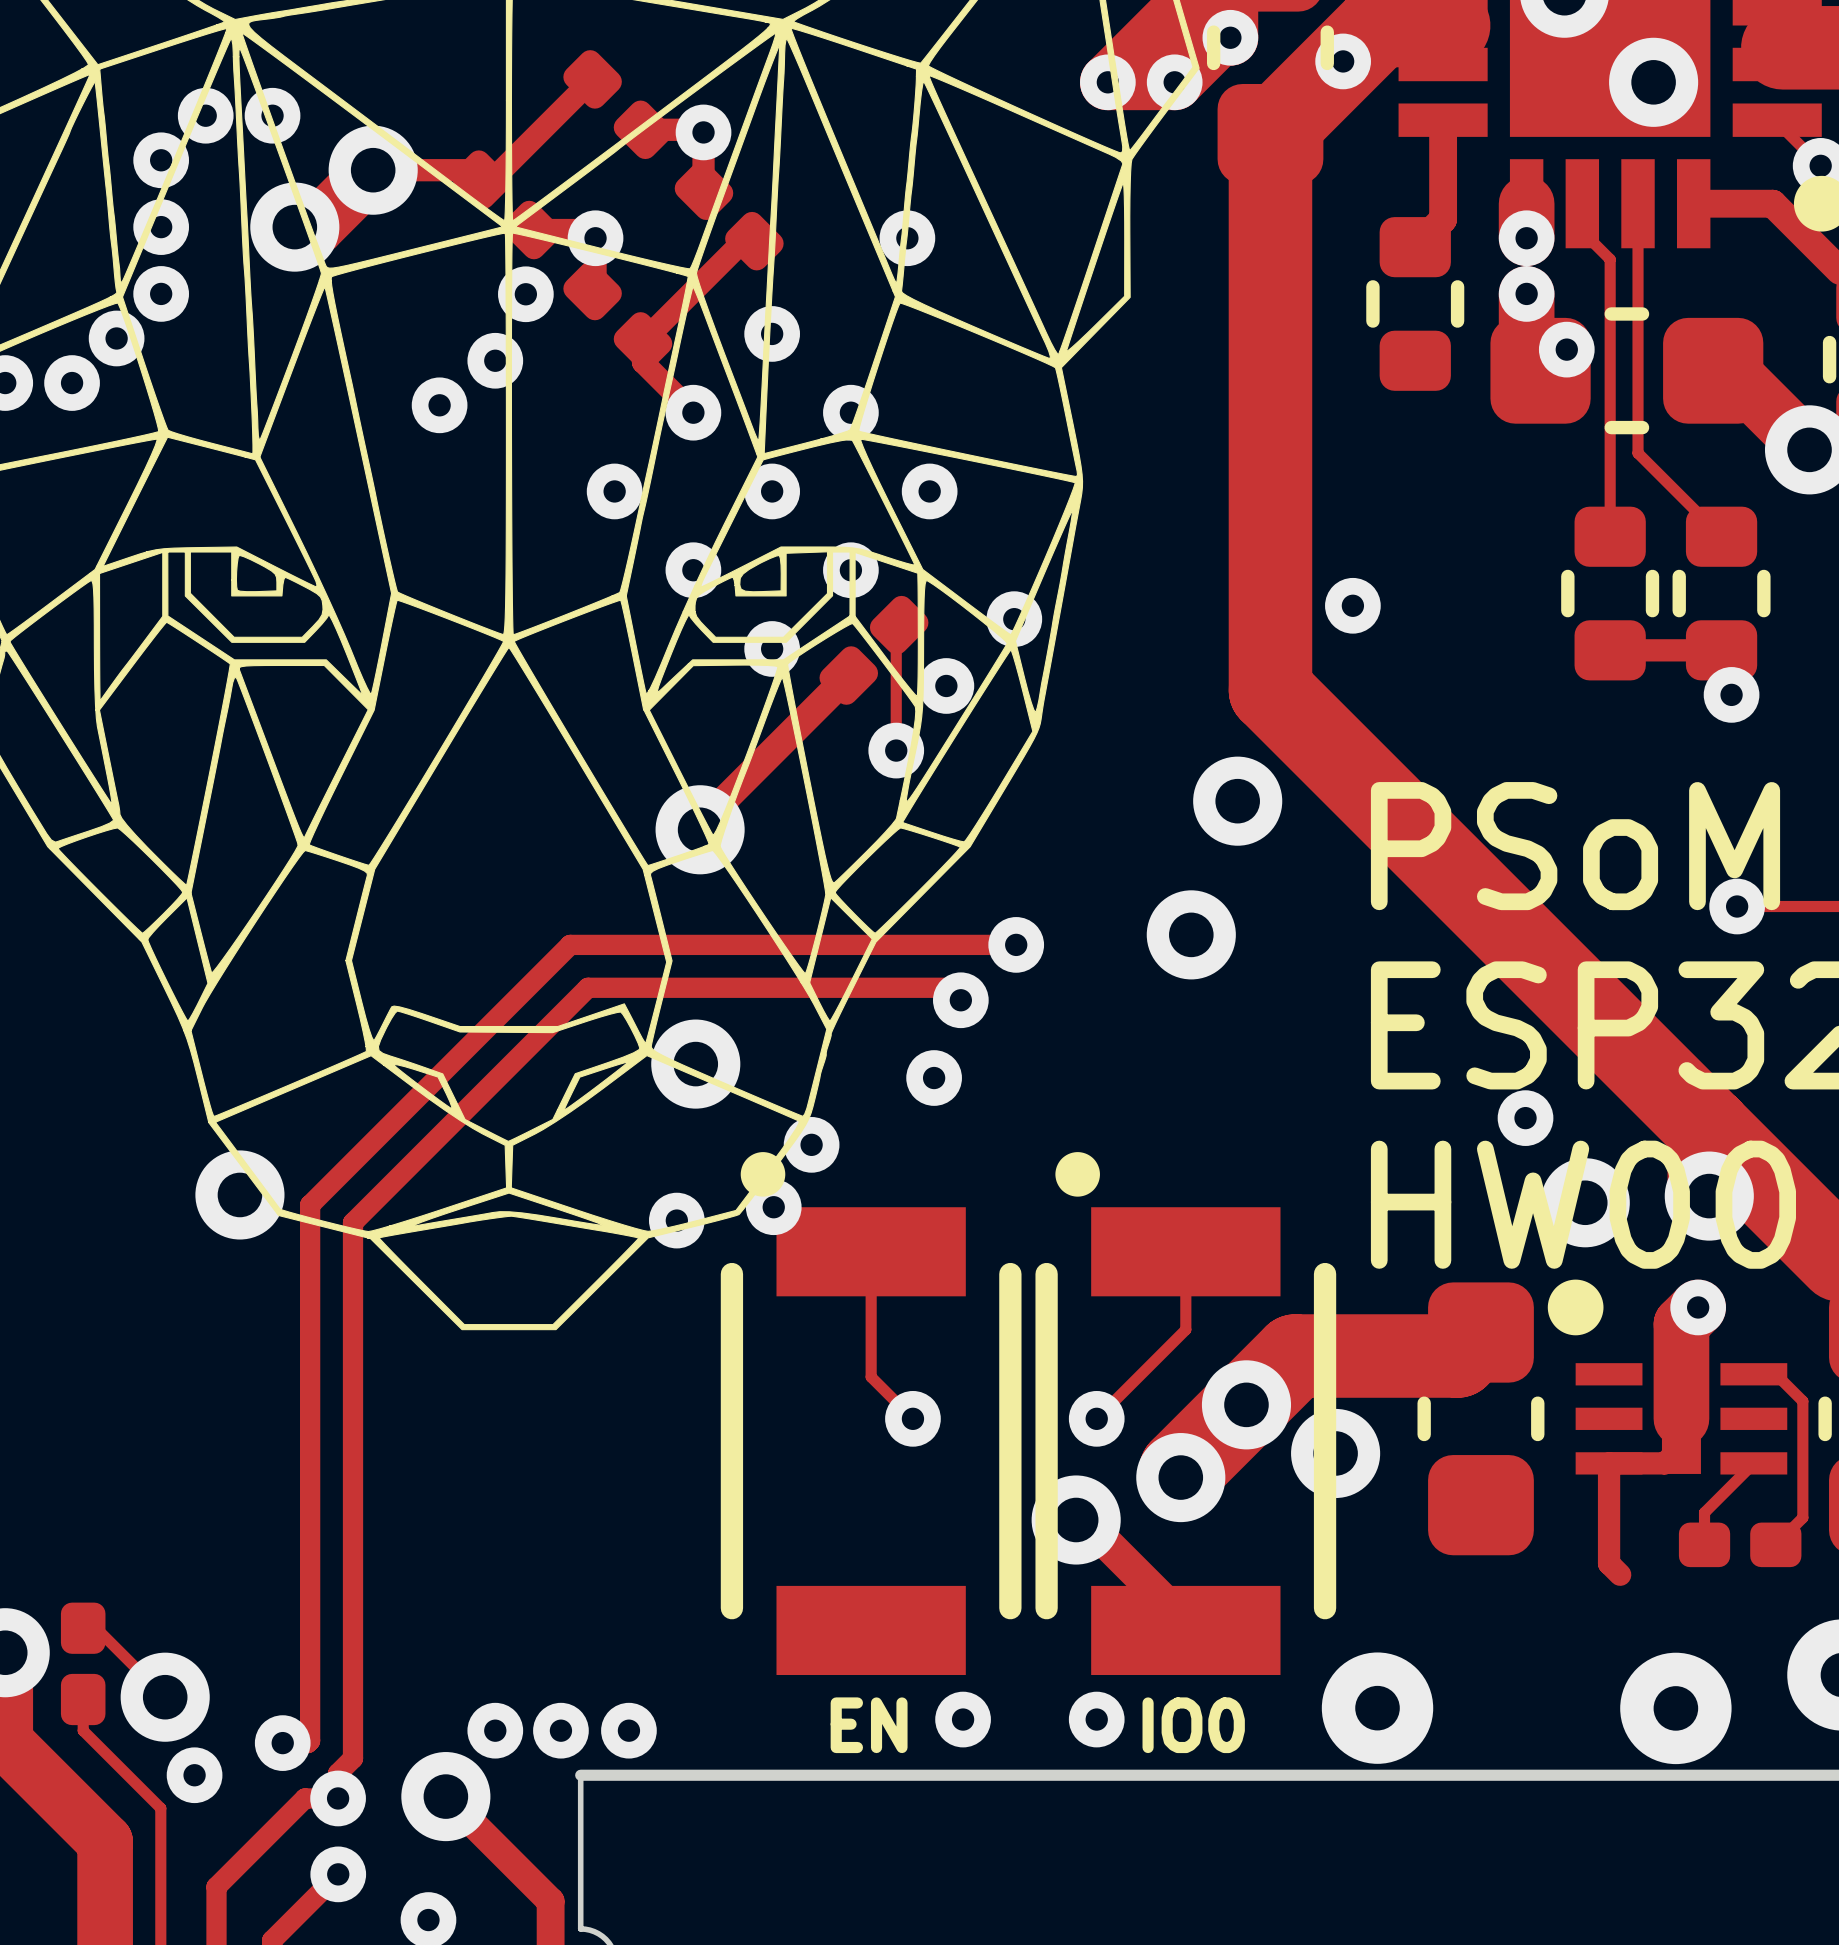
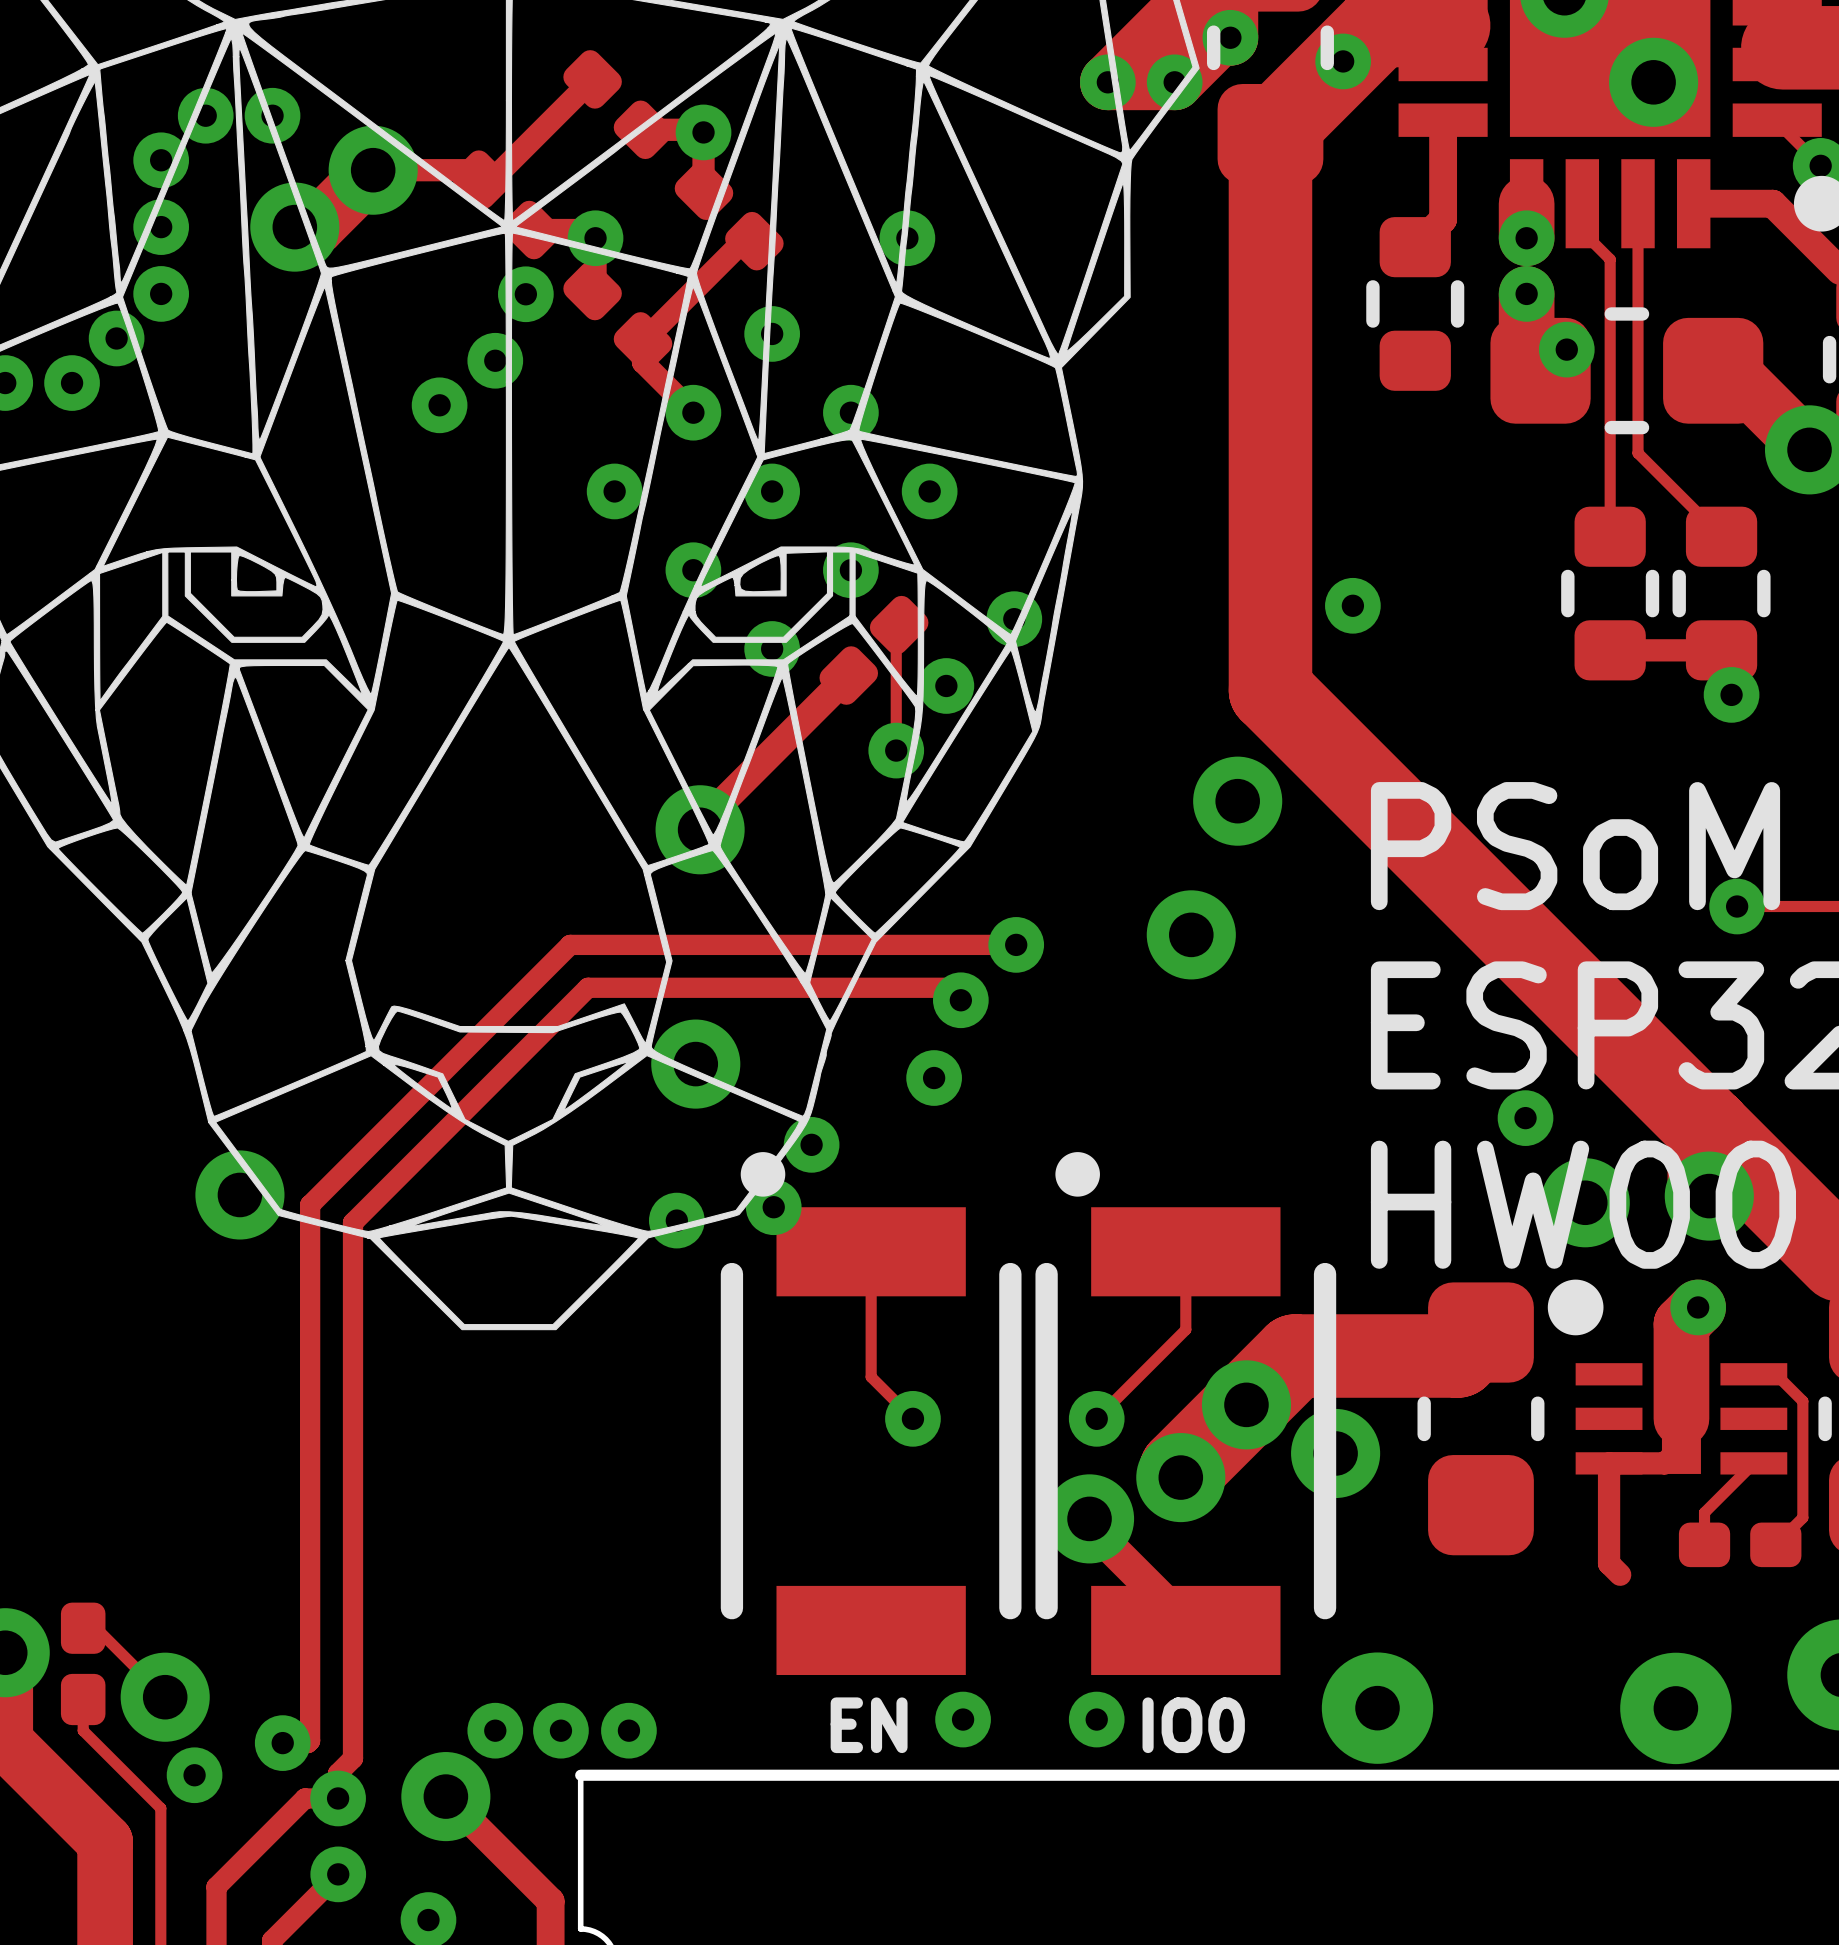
via position: (1076, 1520) -> (1089, 1518)

